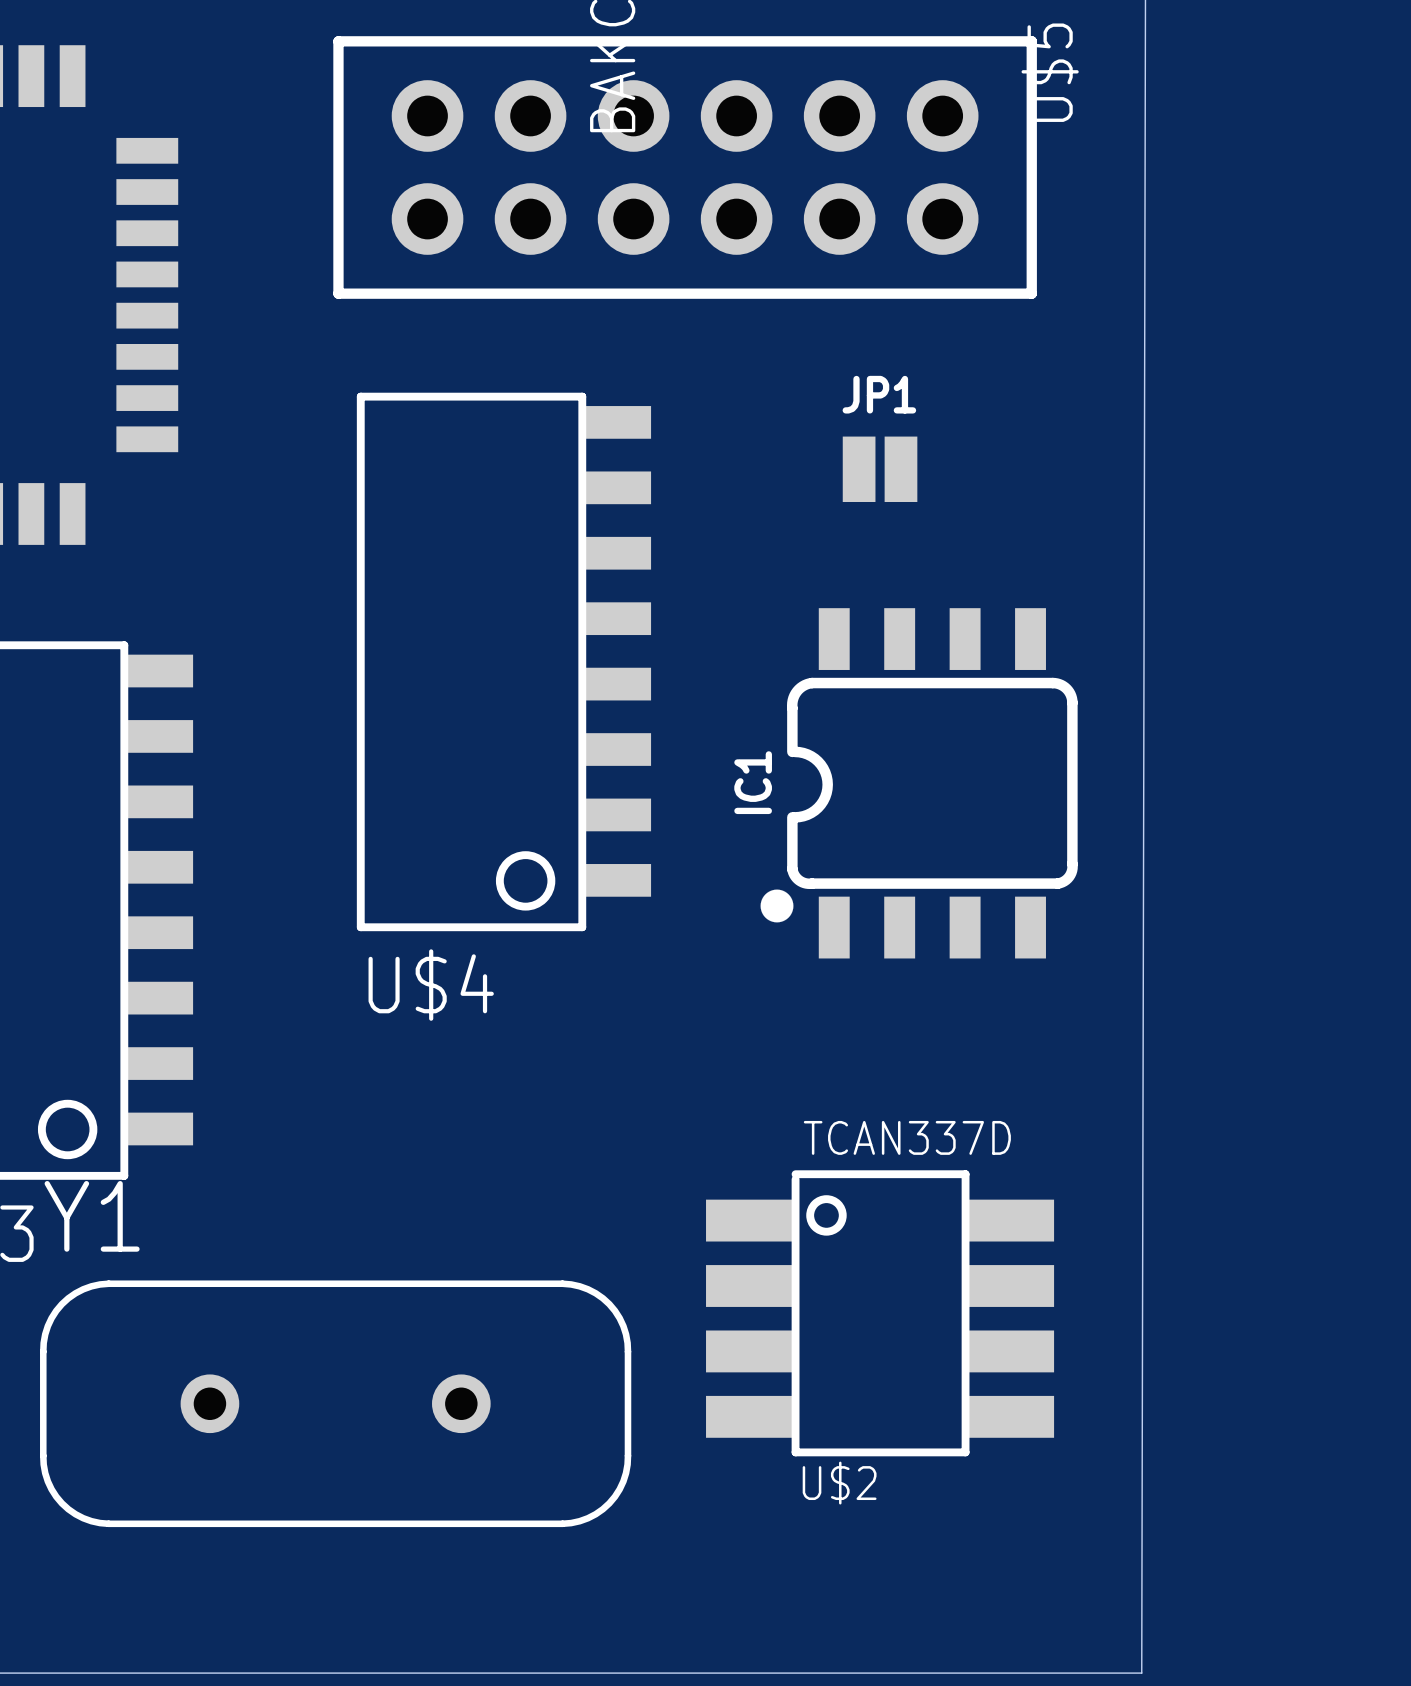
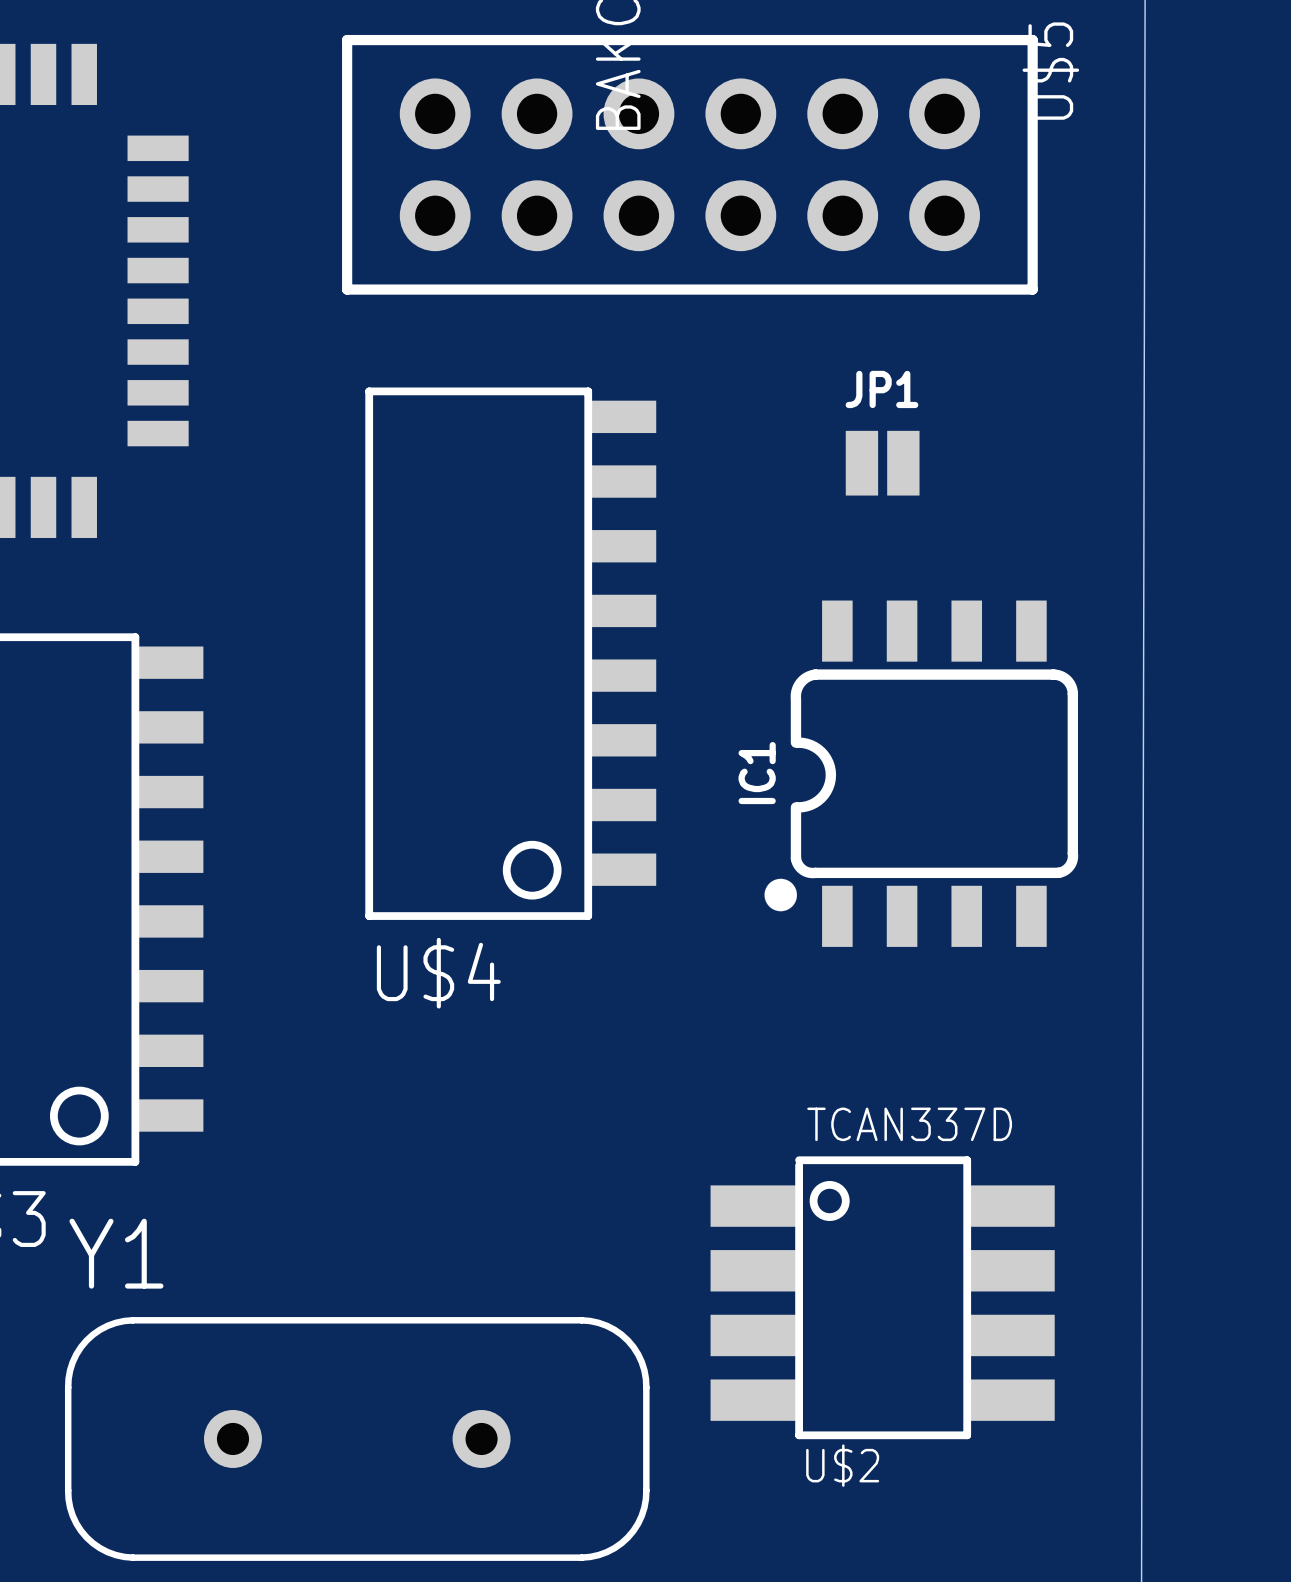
Y1 position: (335, 1403) -> (357, 1438)

